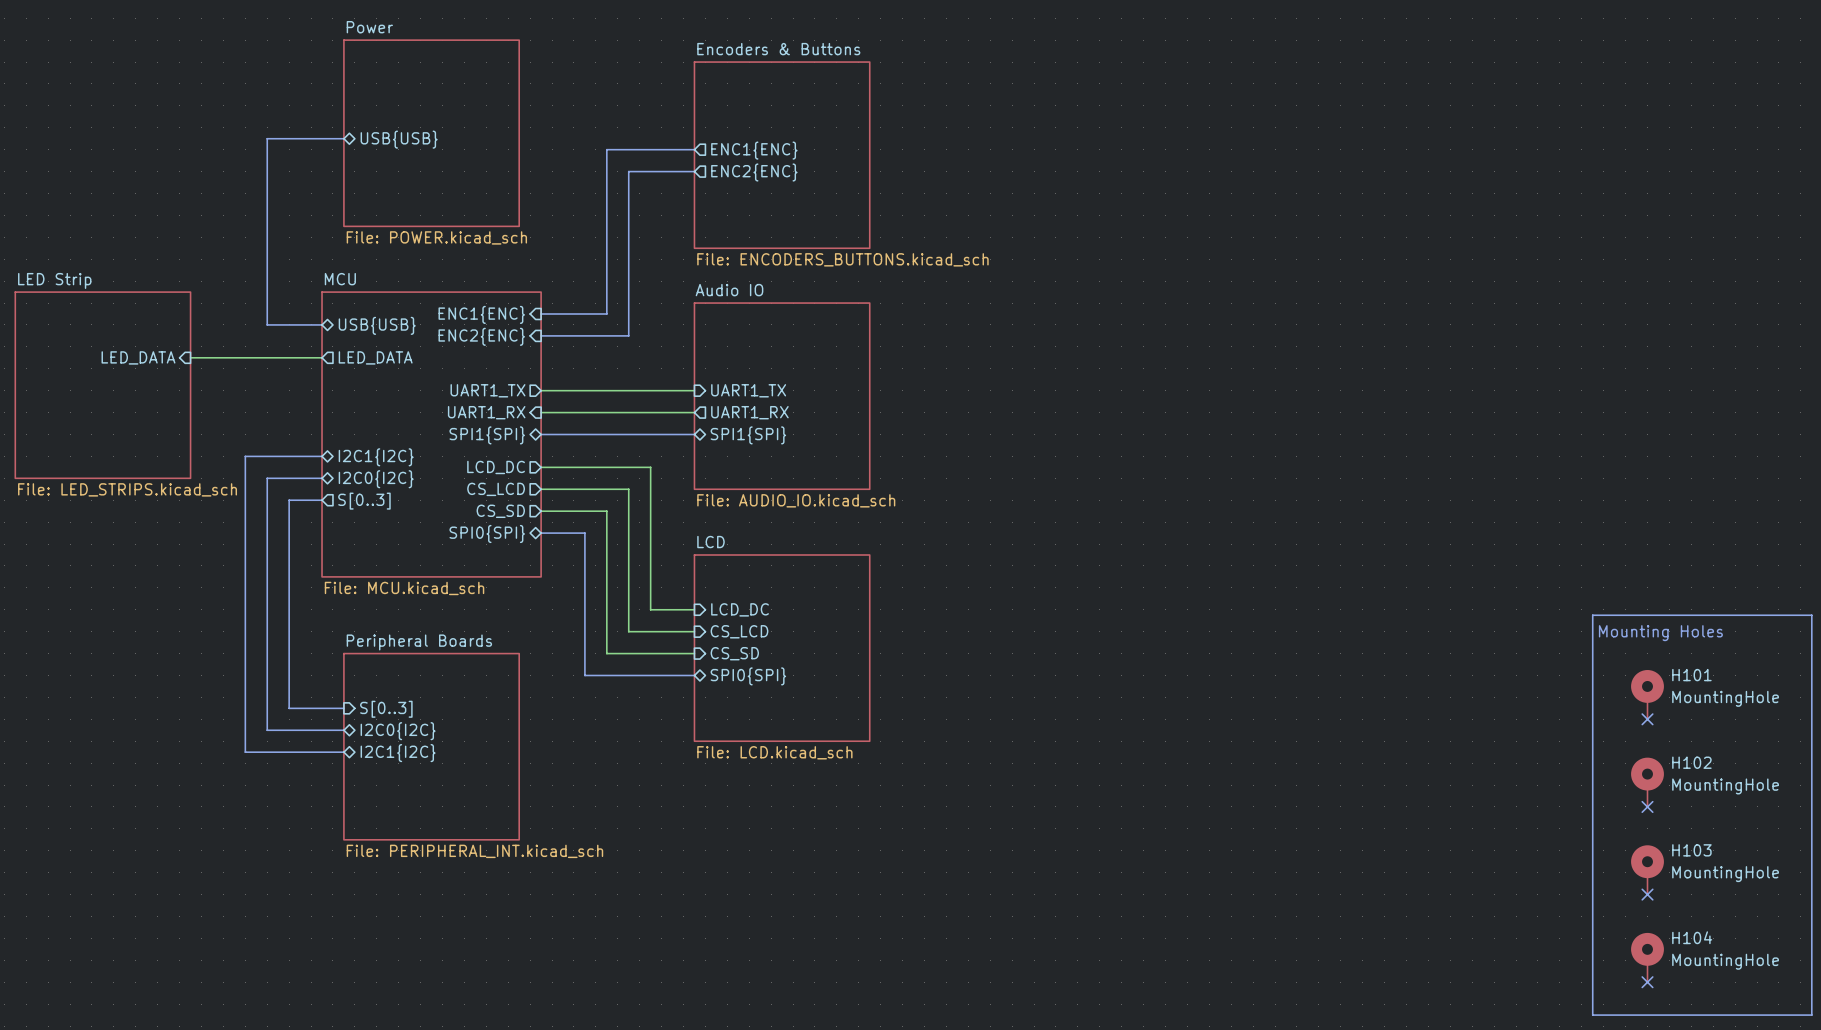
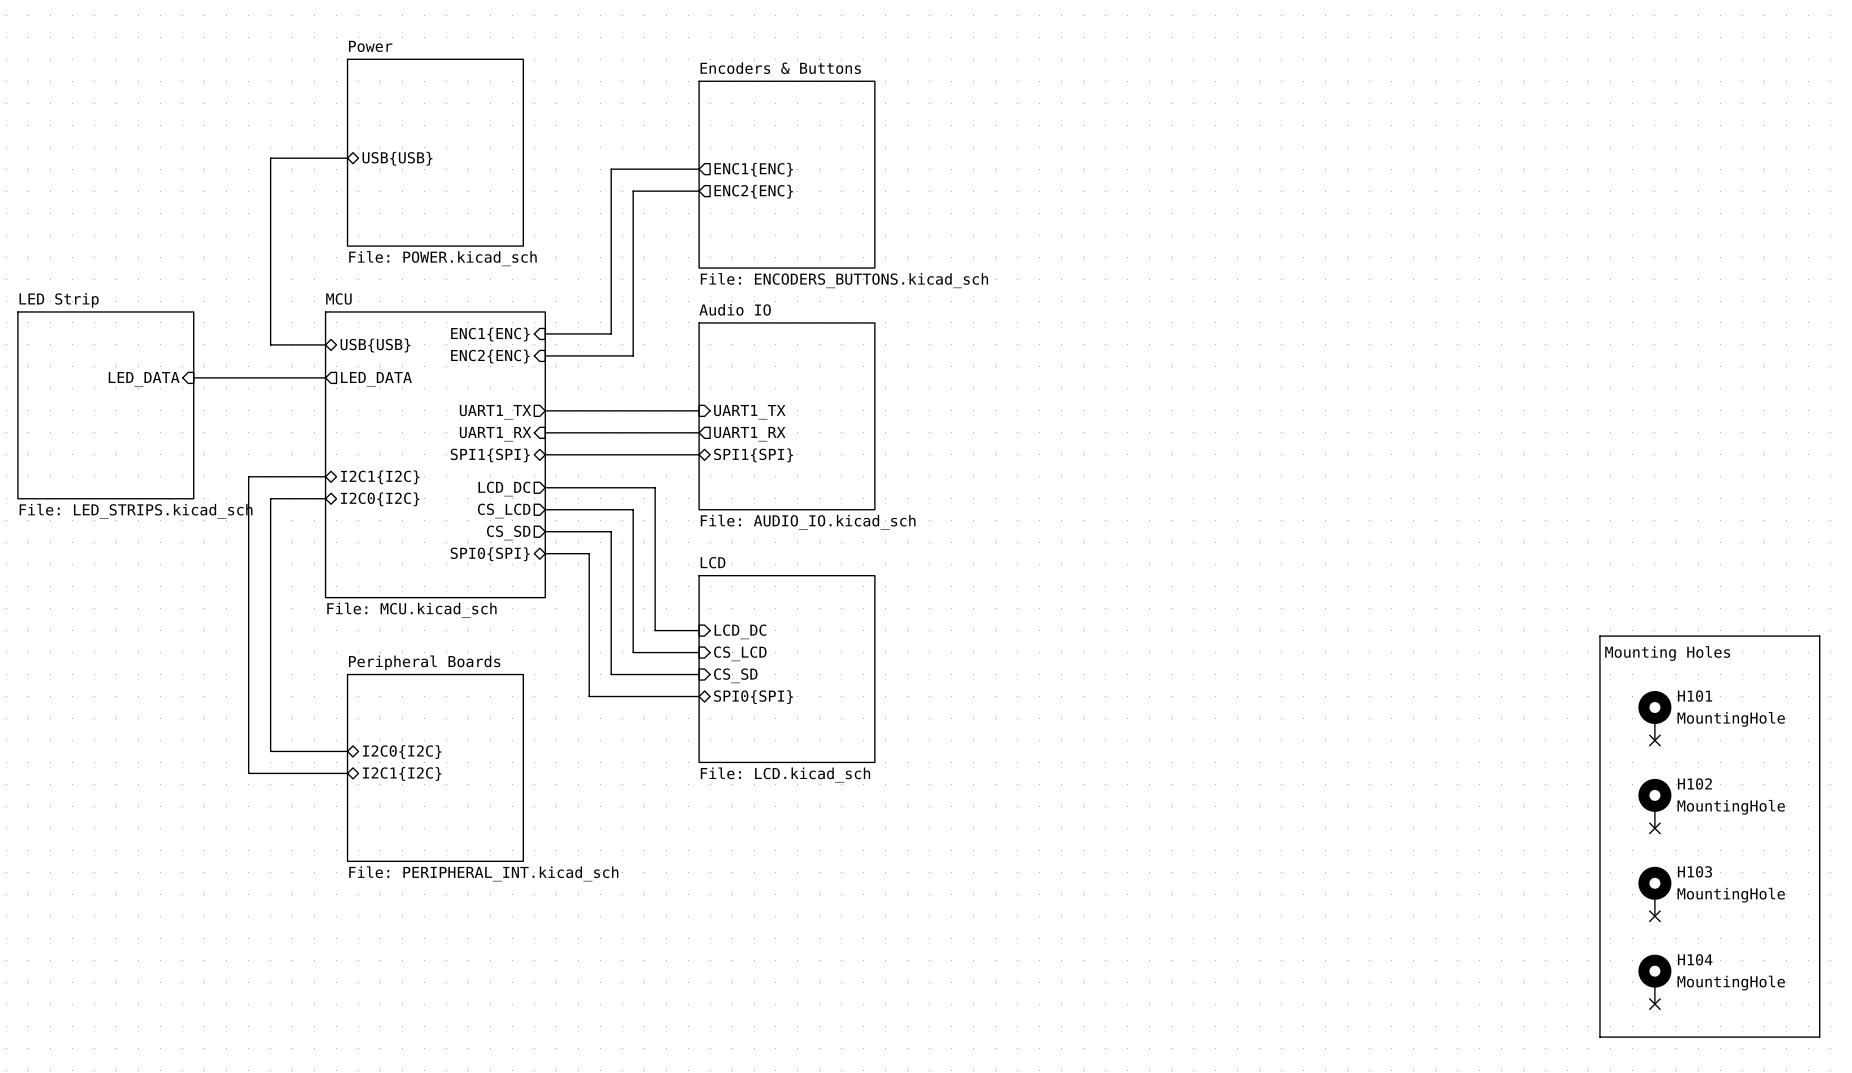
bus: (322, 500) (289, 500) (289, 708) (343, 708) -> none
sheet pin: S[0..3] (364, 501) -> none
sheet pin: S[0..3] (386, 709) -> none

